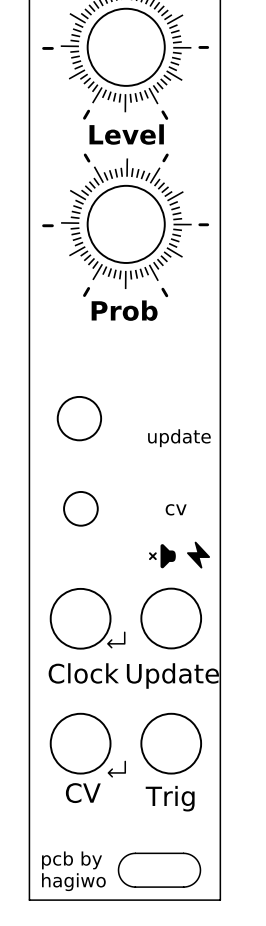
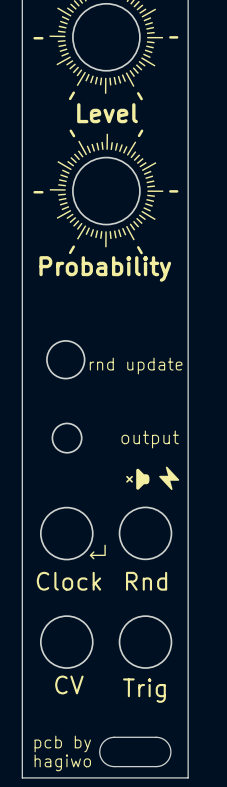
text: Prob (124, 310) -> Probability (105, 268)
text: update (179, 438) -> rnd update (136, 366)
text: cv (176, 509) -> output (150, 439)
text: Update (172, 676) -> Rnd (146, 581)
drawing: [107, 760, 127, 778] -> none

